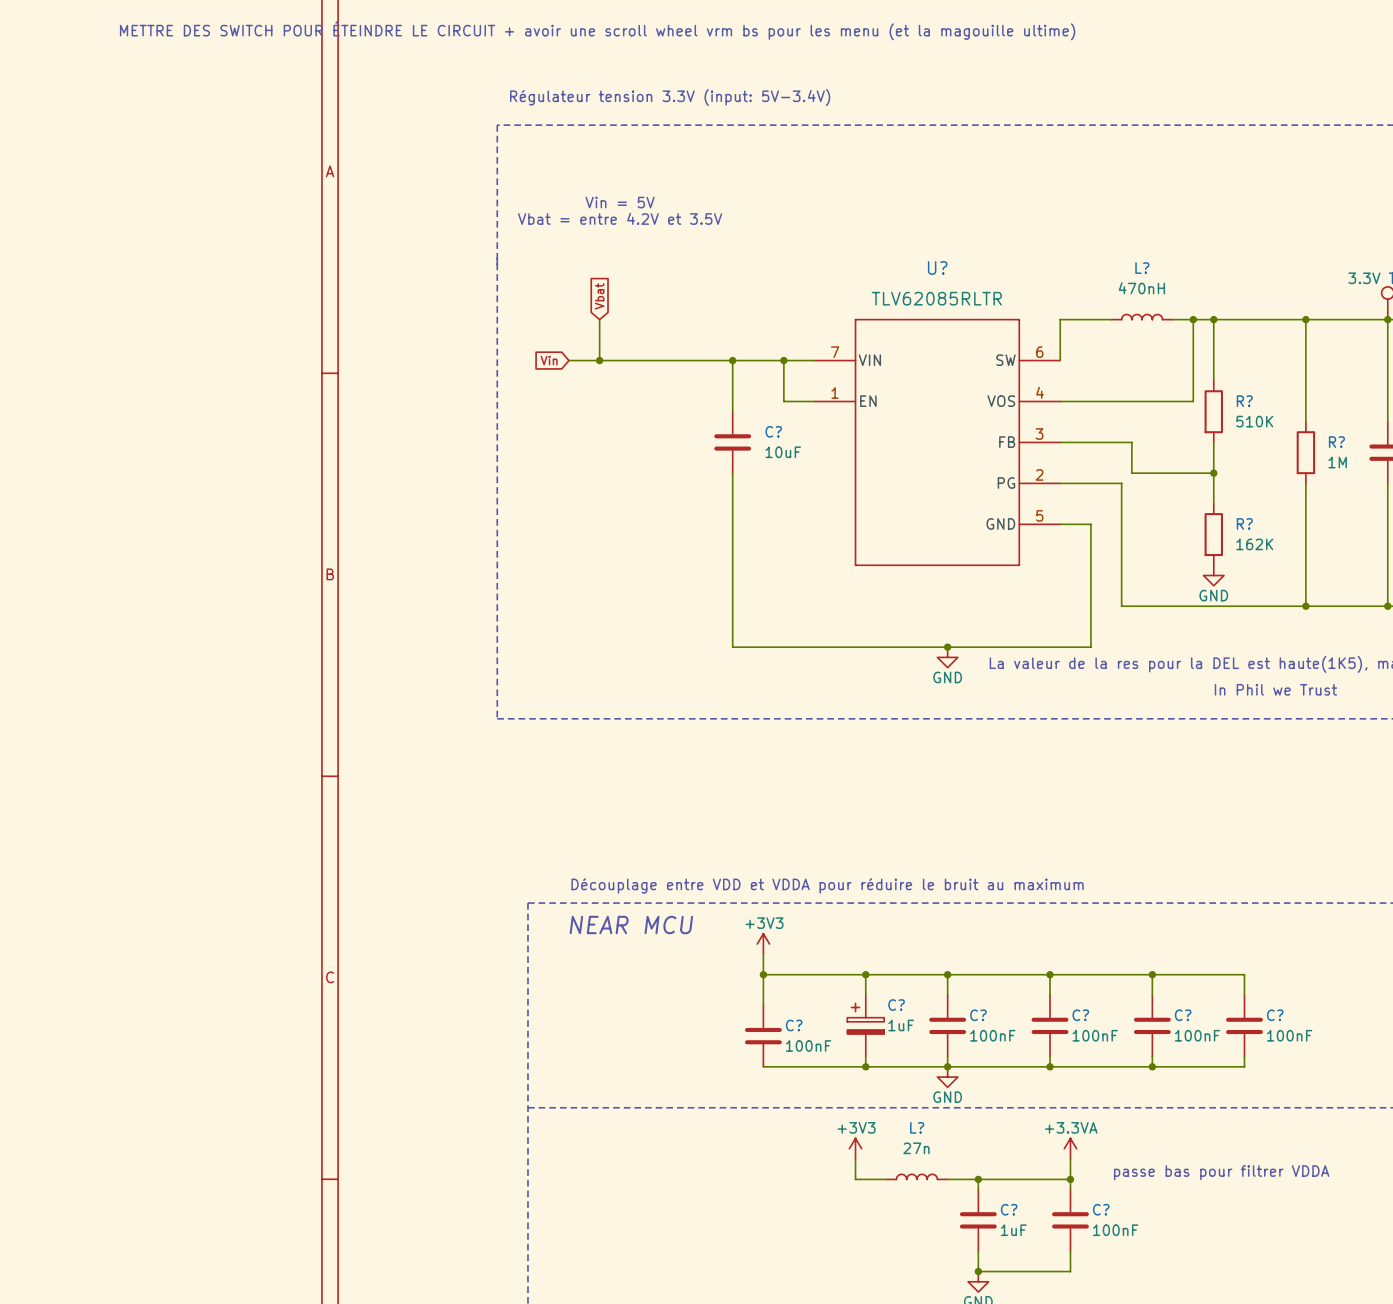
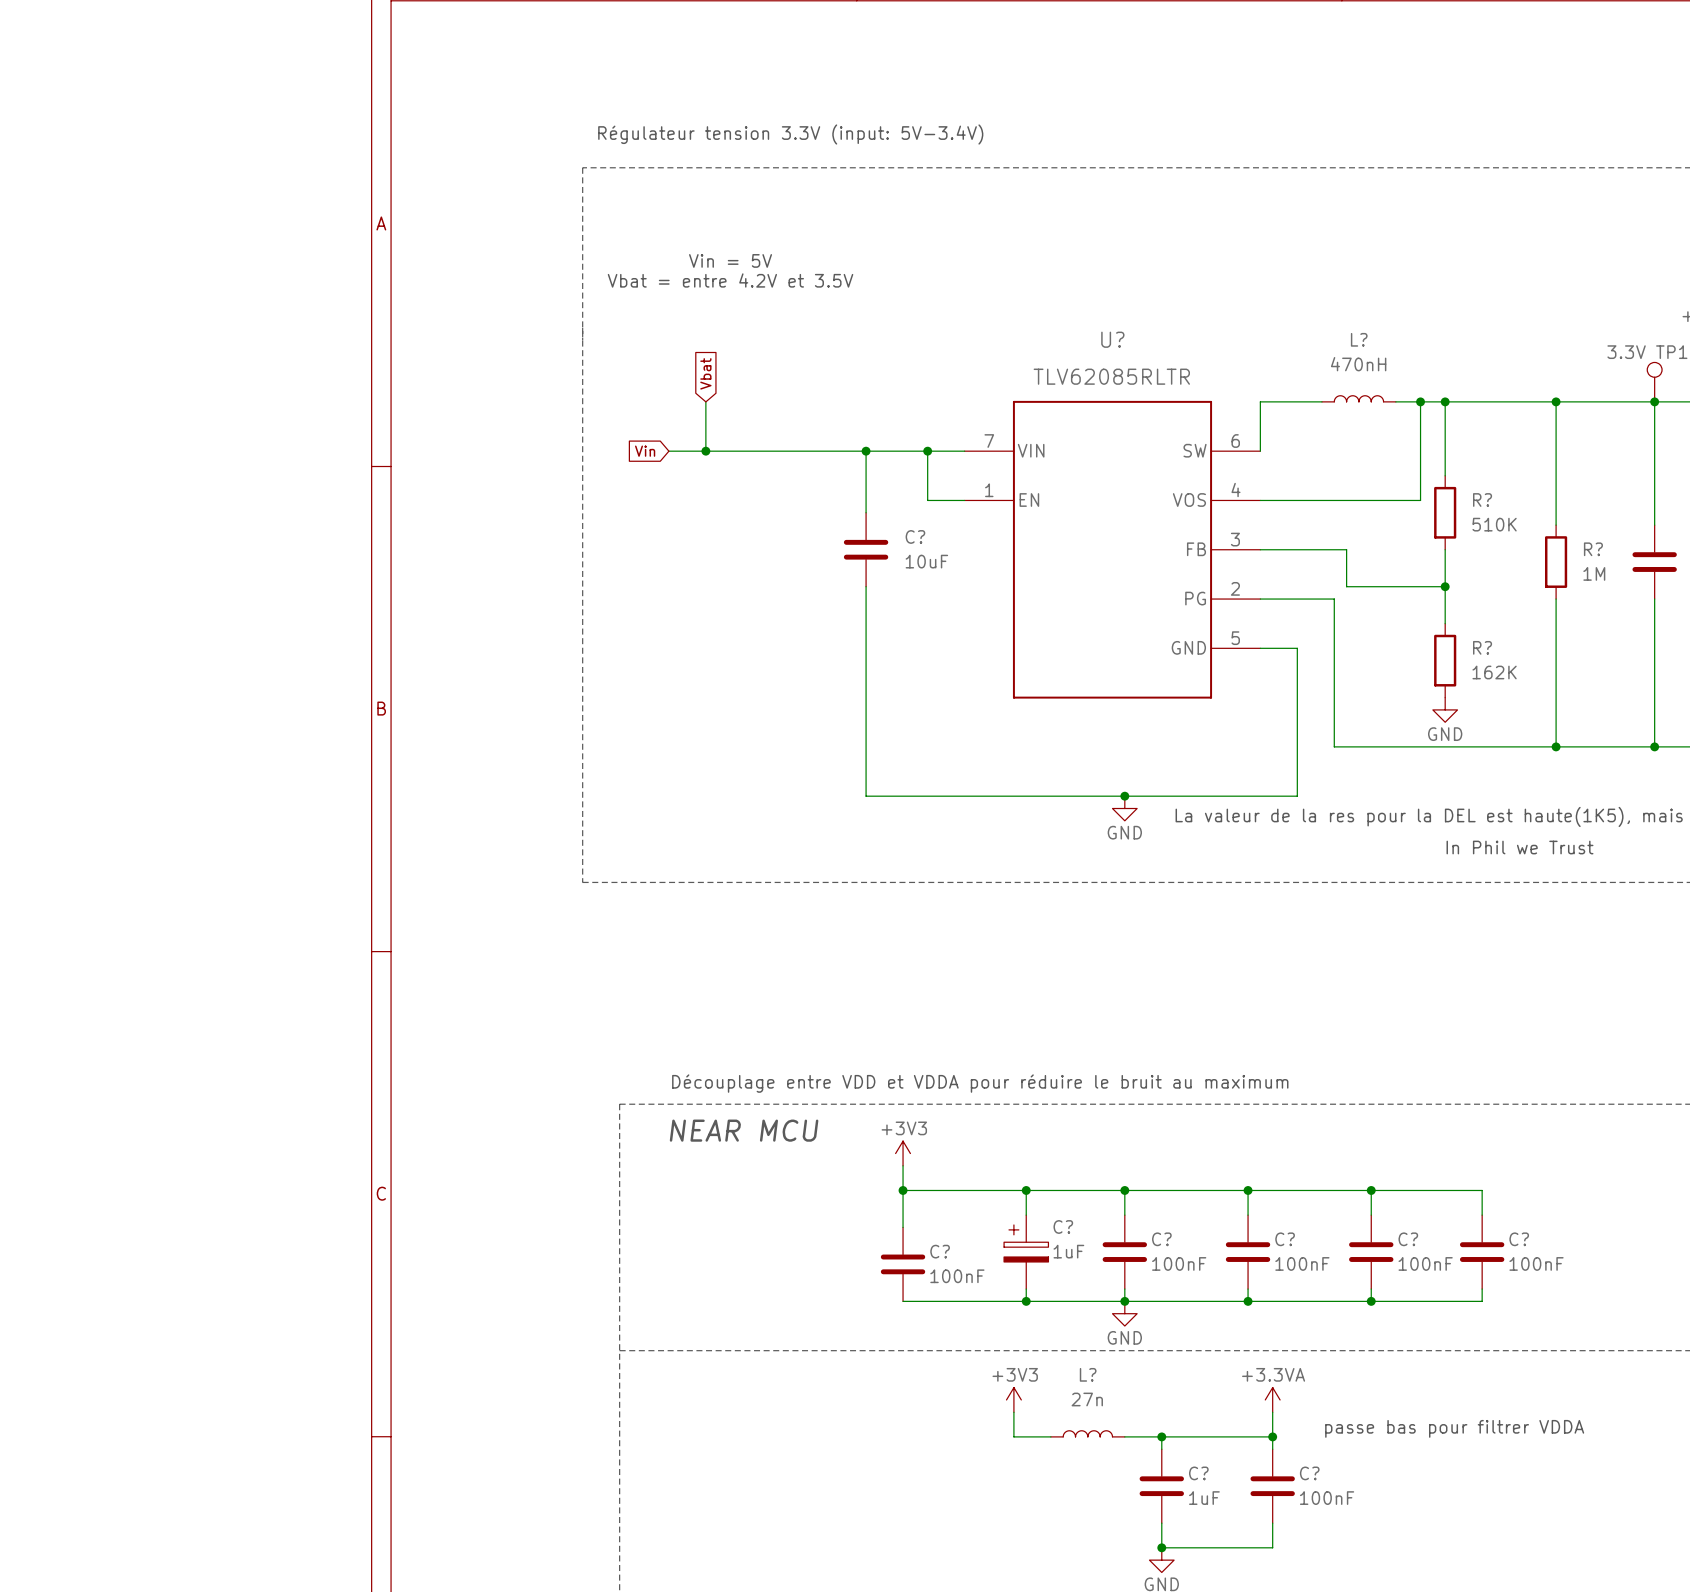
text: METTRE DES SWITCH POUR ÉTEINDRE LE CIRCUIT + avoir une scroll wheel vrm bs pour les menu (et la magouille ultime) (597, 30) -> none

